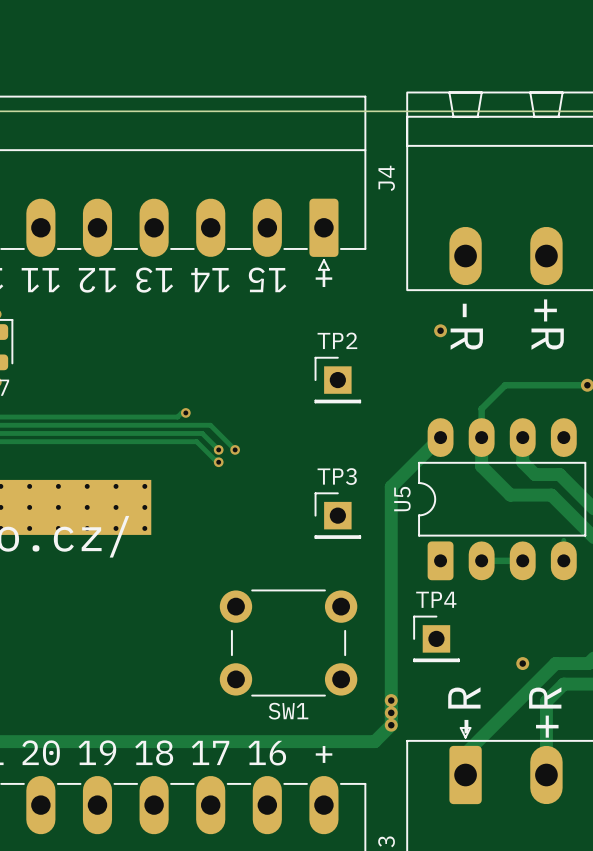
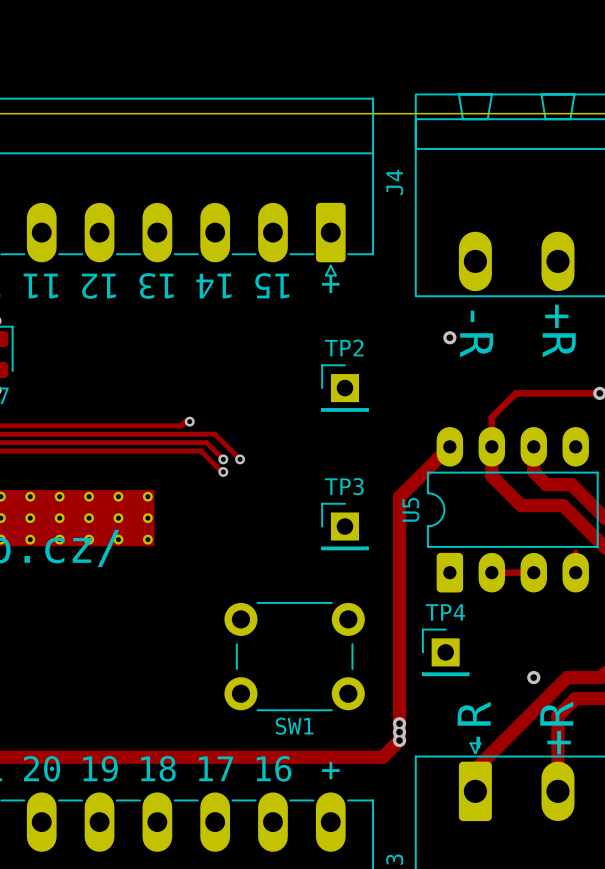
via: (391, 700) -> none
via: none -> (399, 723)
via: (391, 712) -> none
via: none -> (399, 732)

